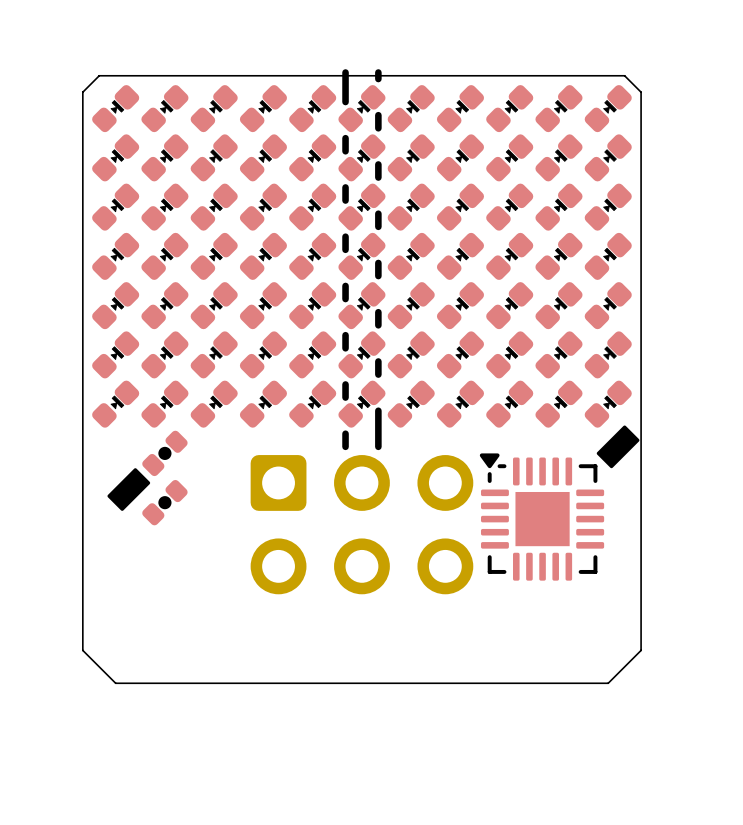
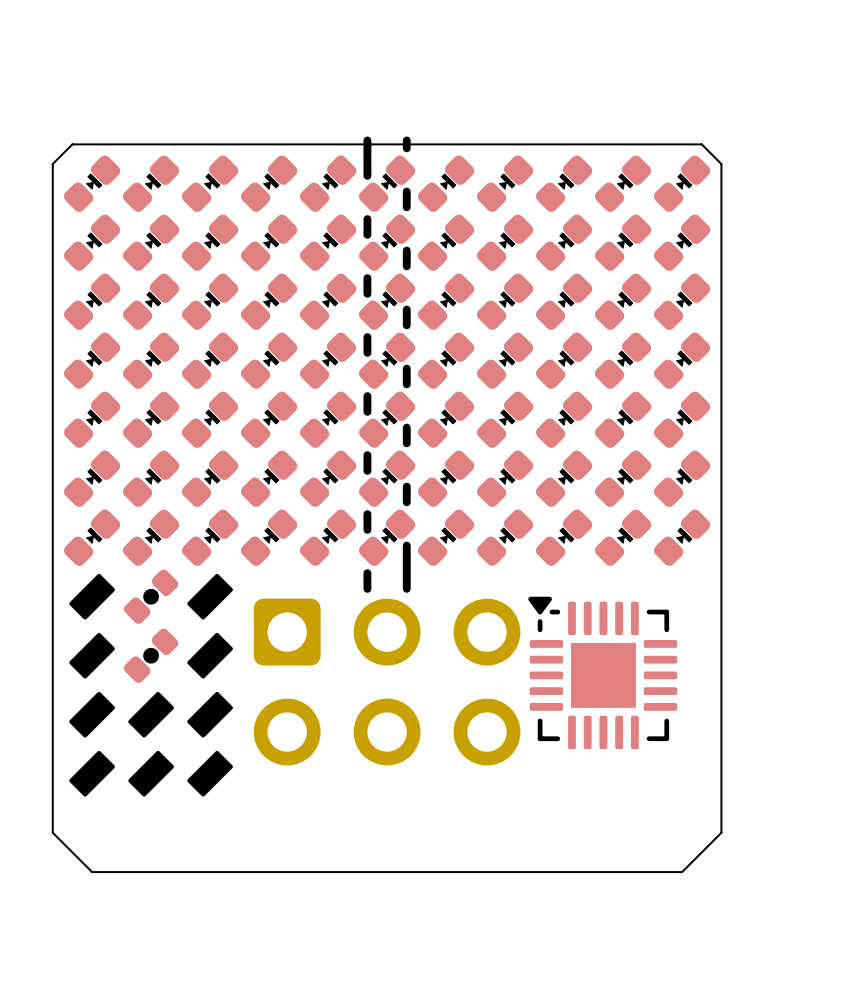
drawing: [596, 425, 640, 469] -> none
drawing: none -> [69, 573, 115, 620]
drawing: none -> [69, 573, 233, 797]
drawing shape: [107, 468, 151, 511] -> [69, 632, 115, 679]

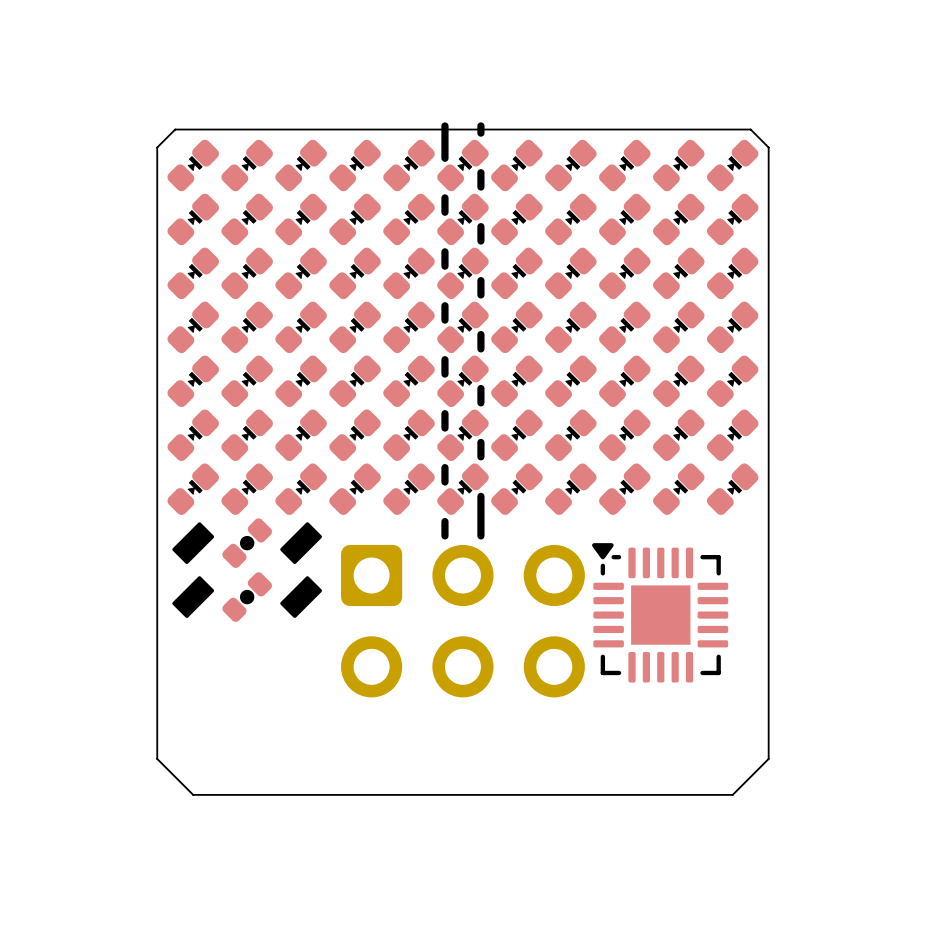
drawing: [69, 691, 233, 797] -> none

